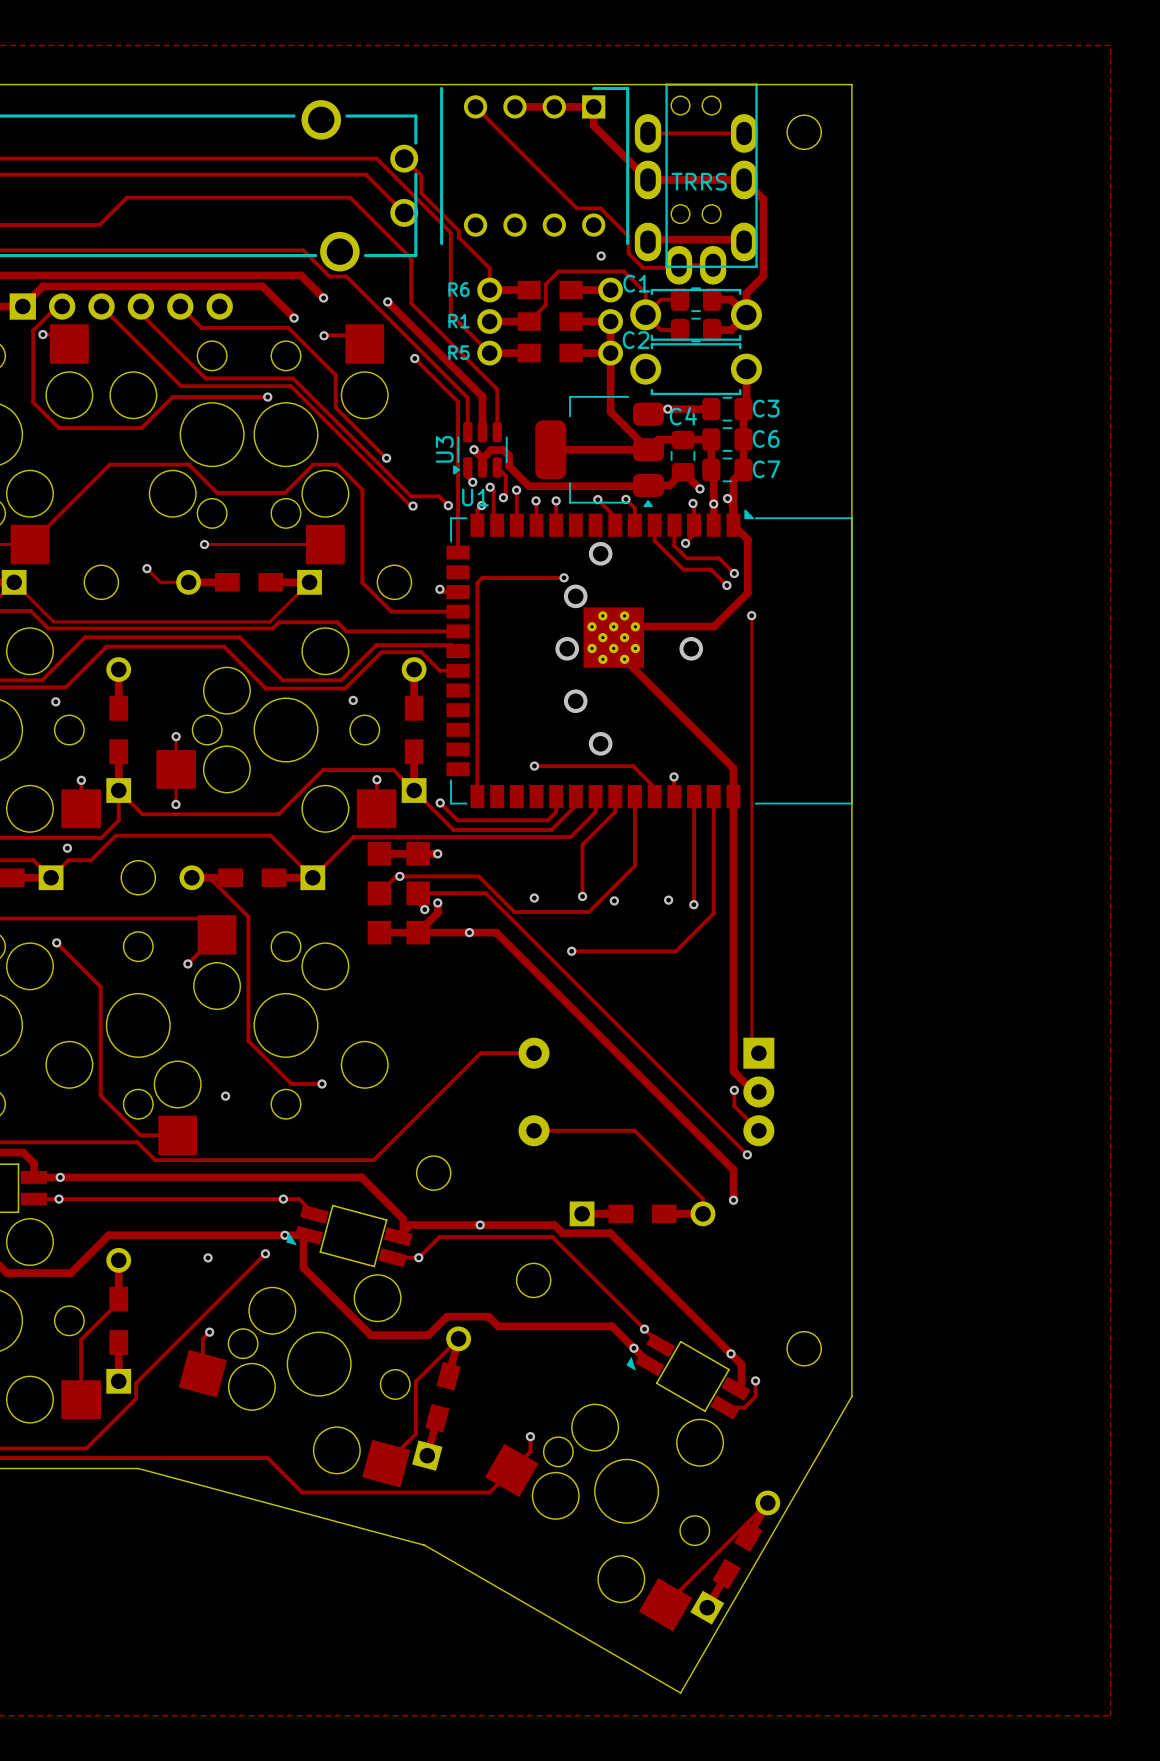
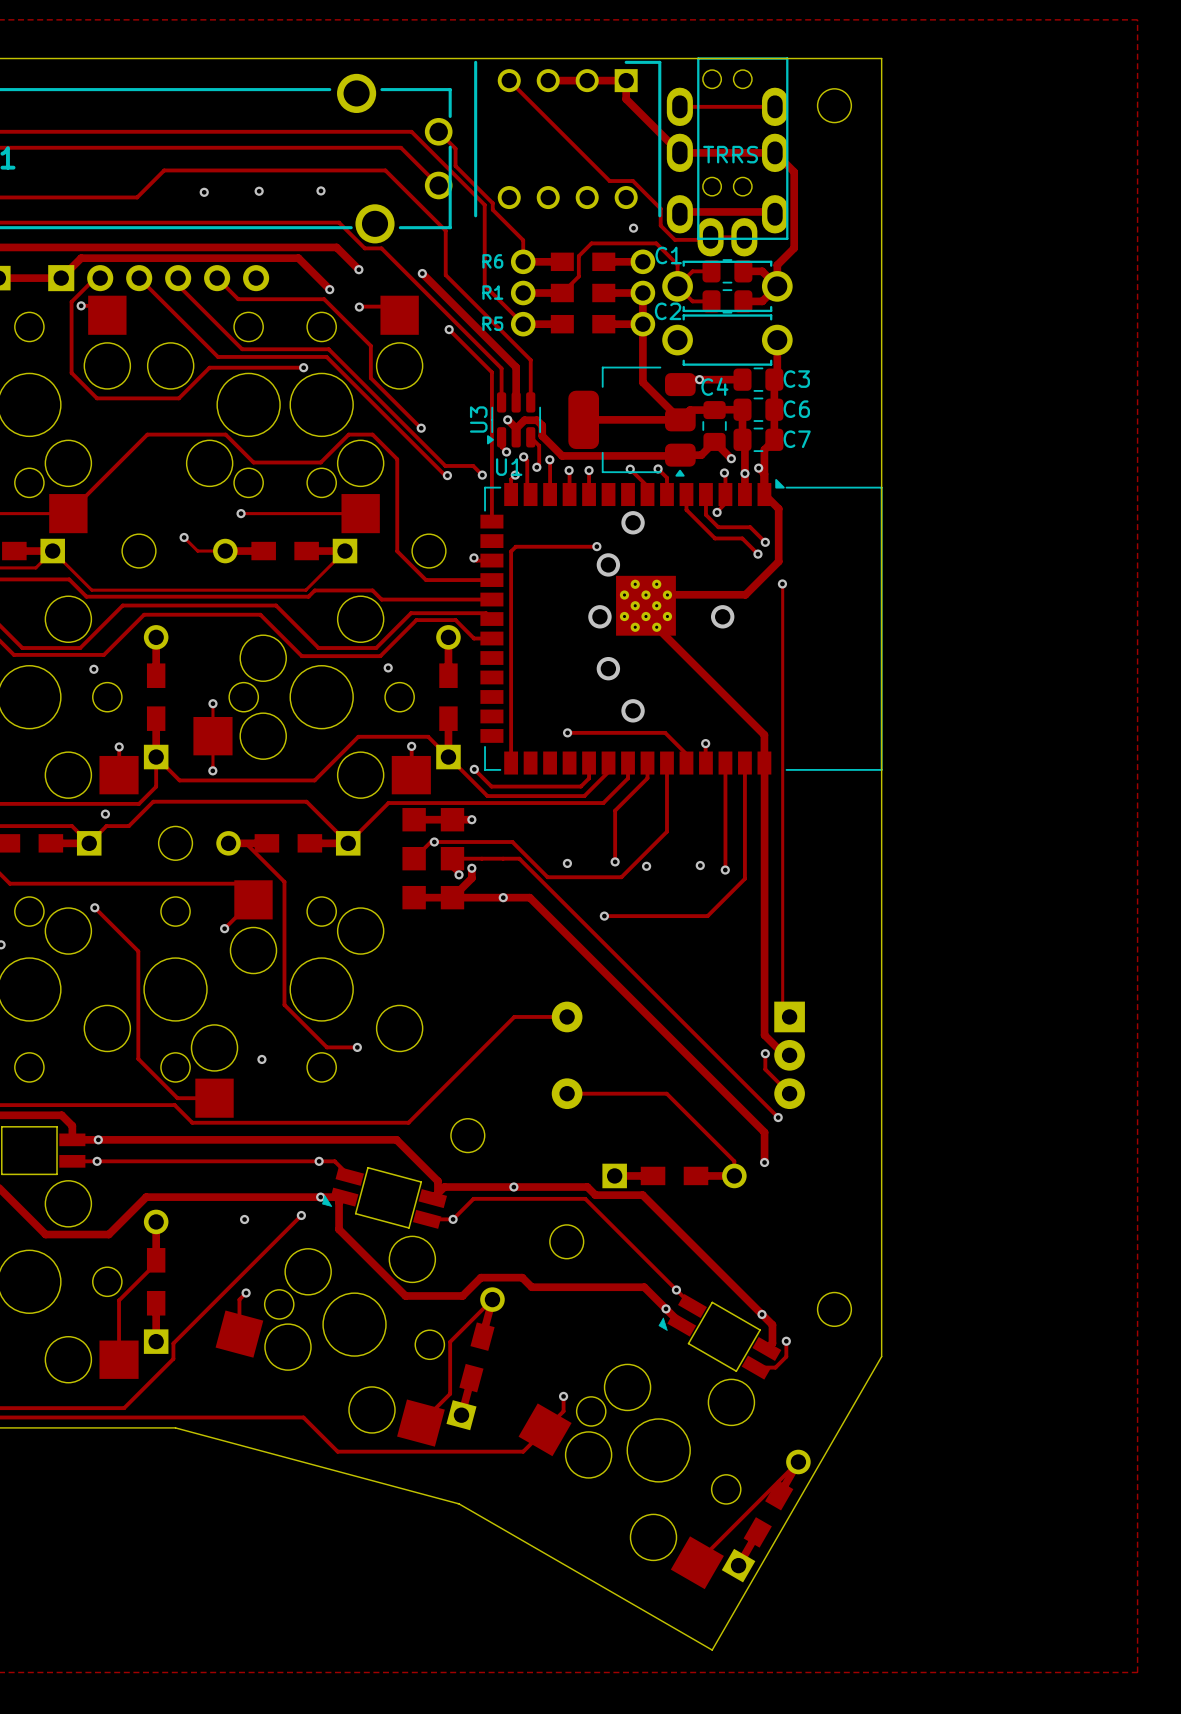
via: none -> (259, 191)
via: none -> (320, 190)
via: none -> (204, 192)

